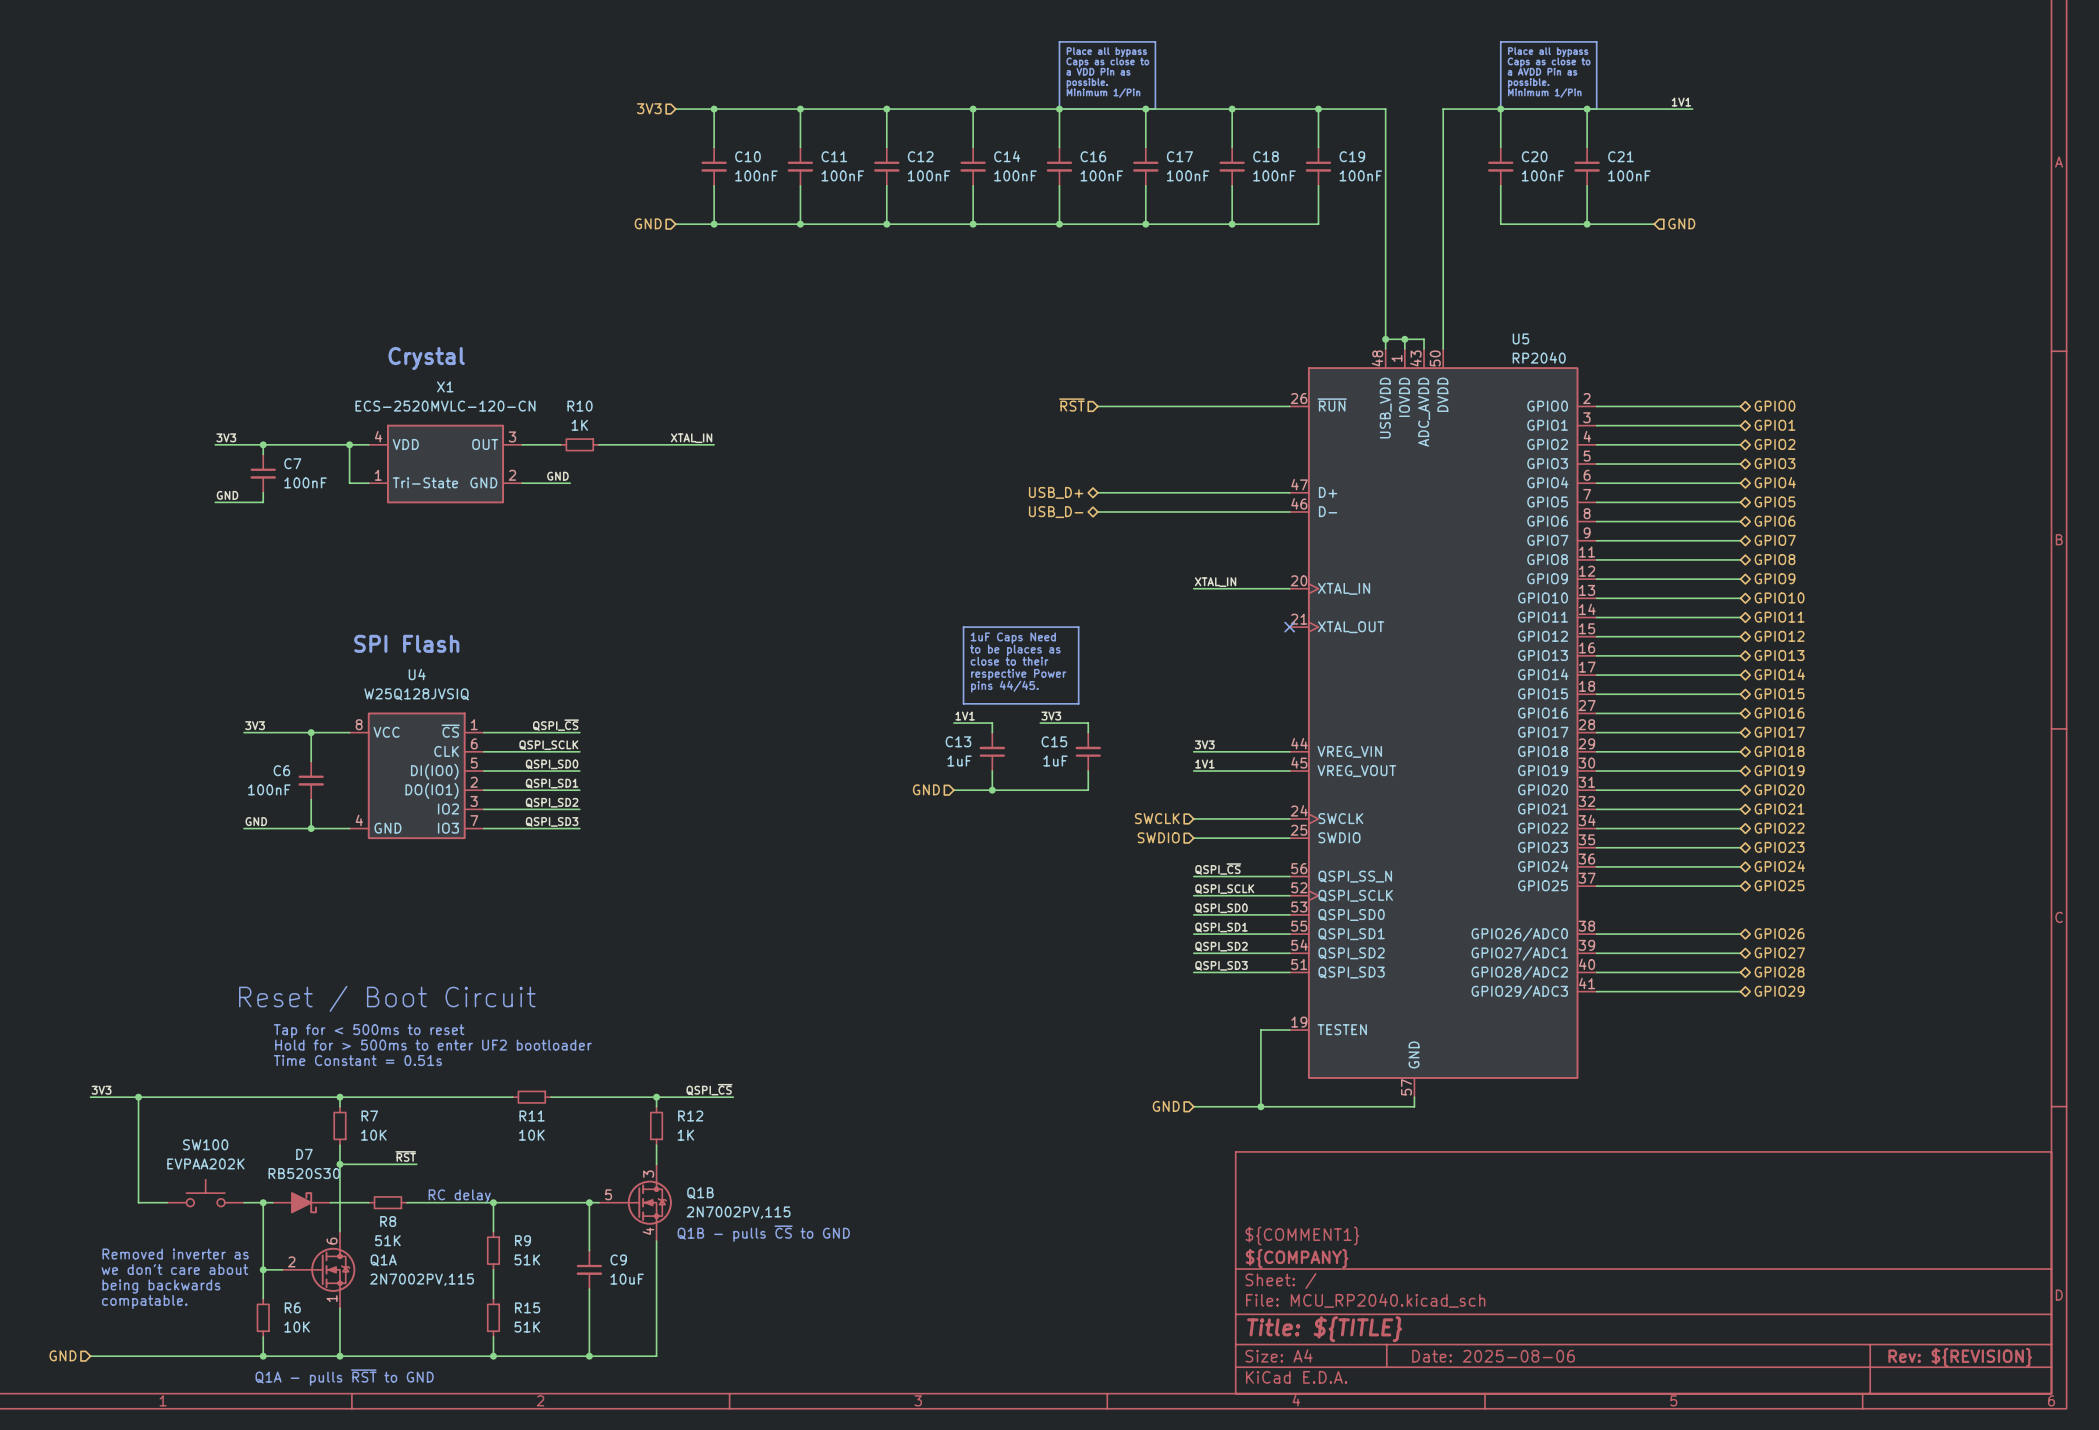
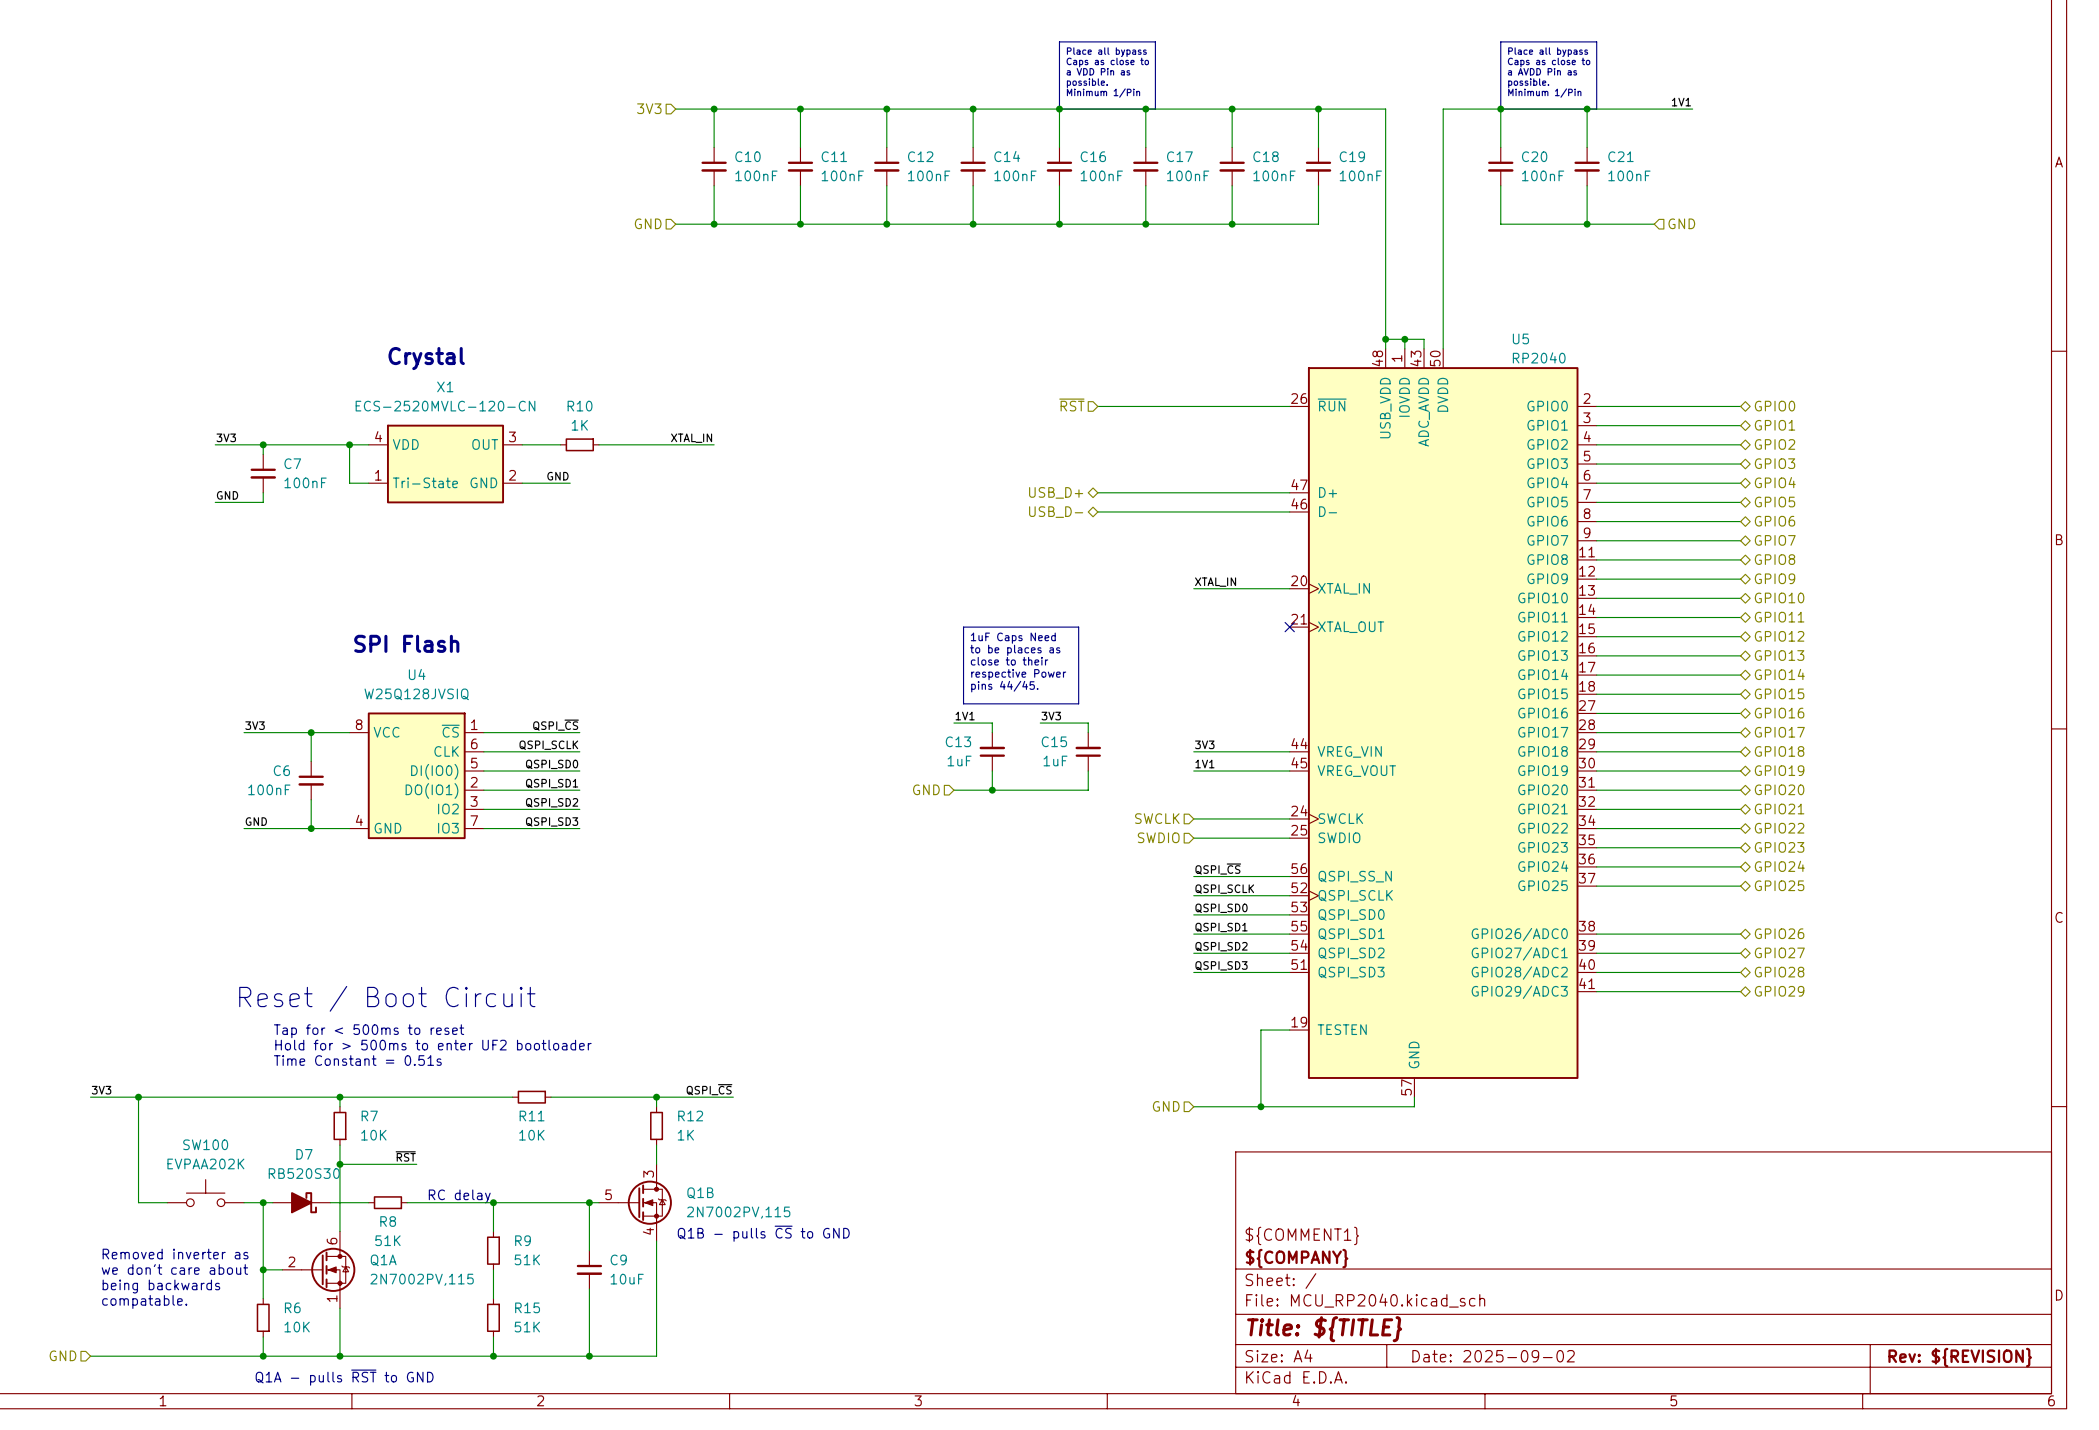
title block: Date: 2025-08-06 (1493, 1356) -> Date: 2025-09-02 (1493, 1356)

